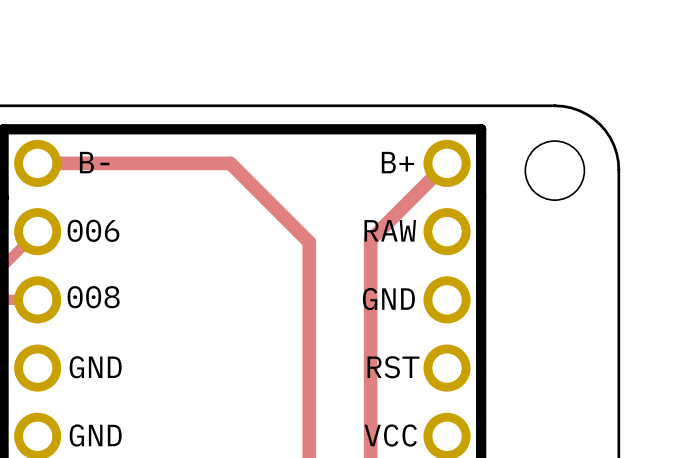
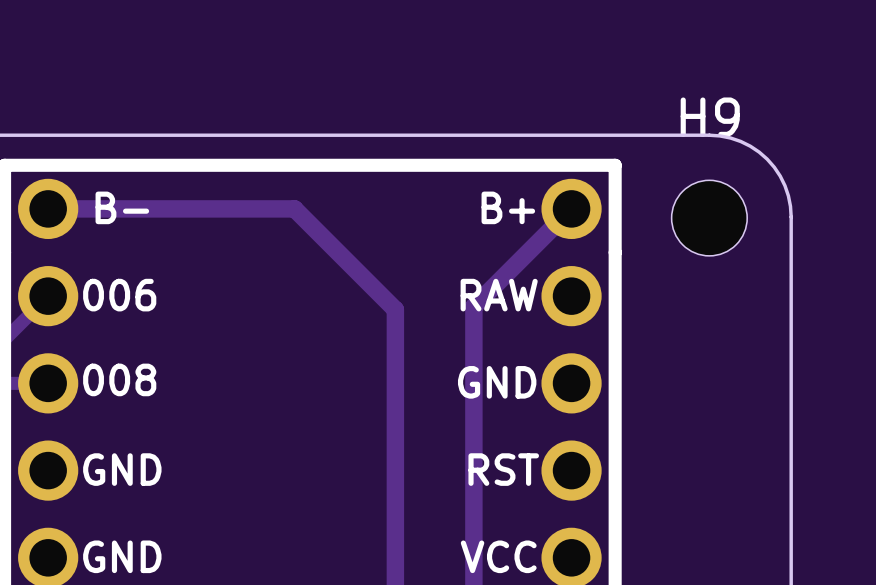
H9 name: none -> H9 (710, 117)

